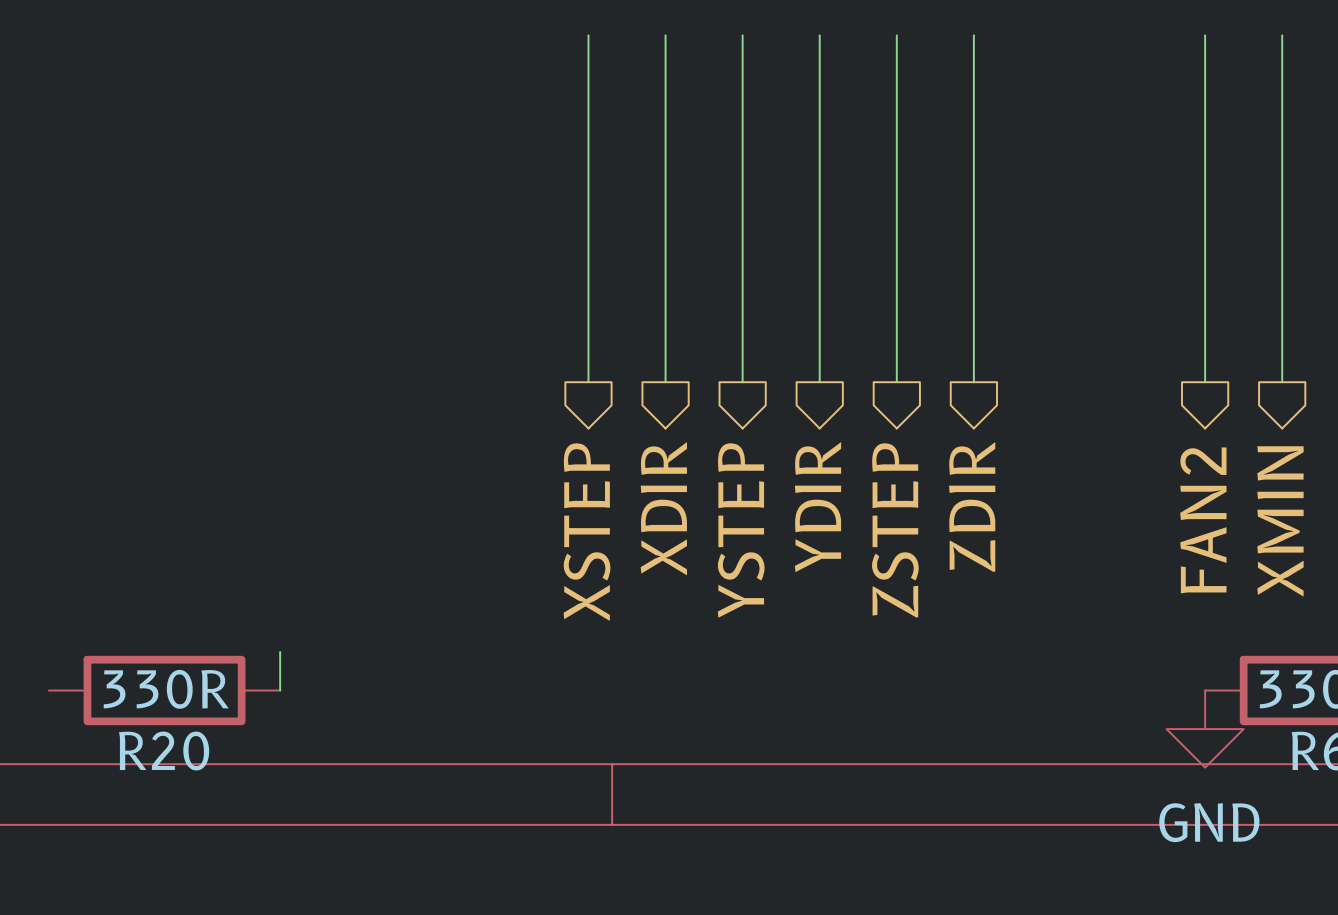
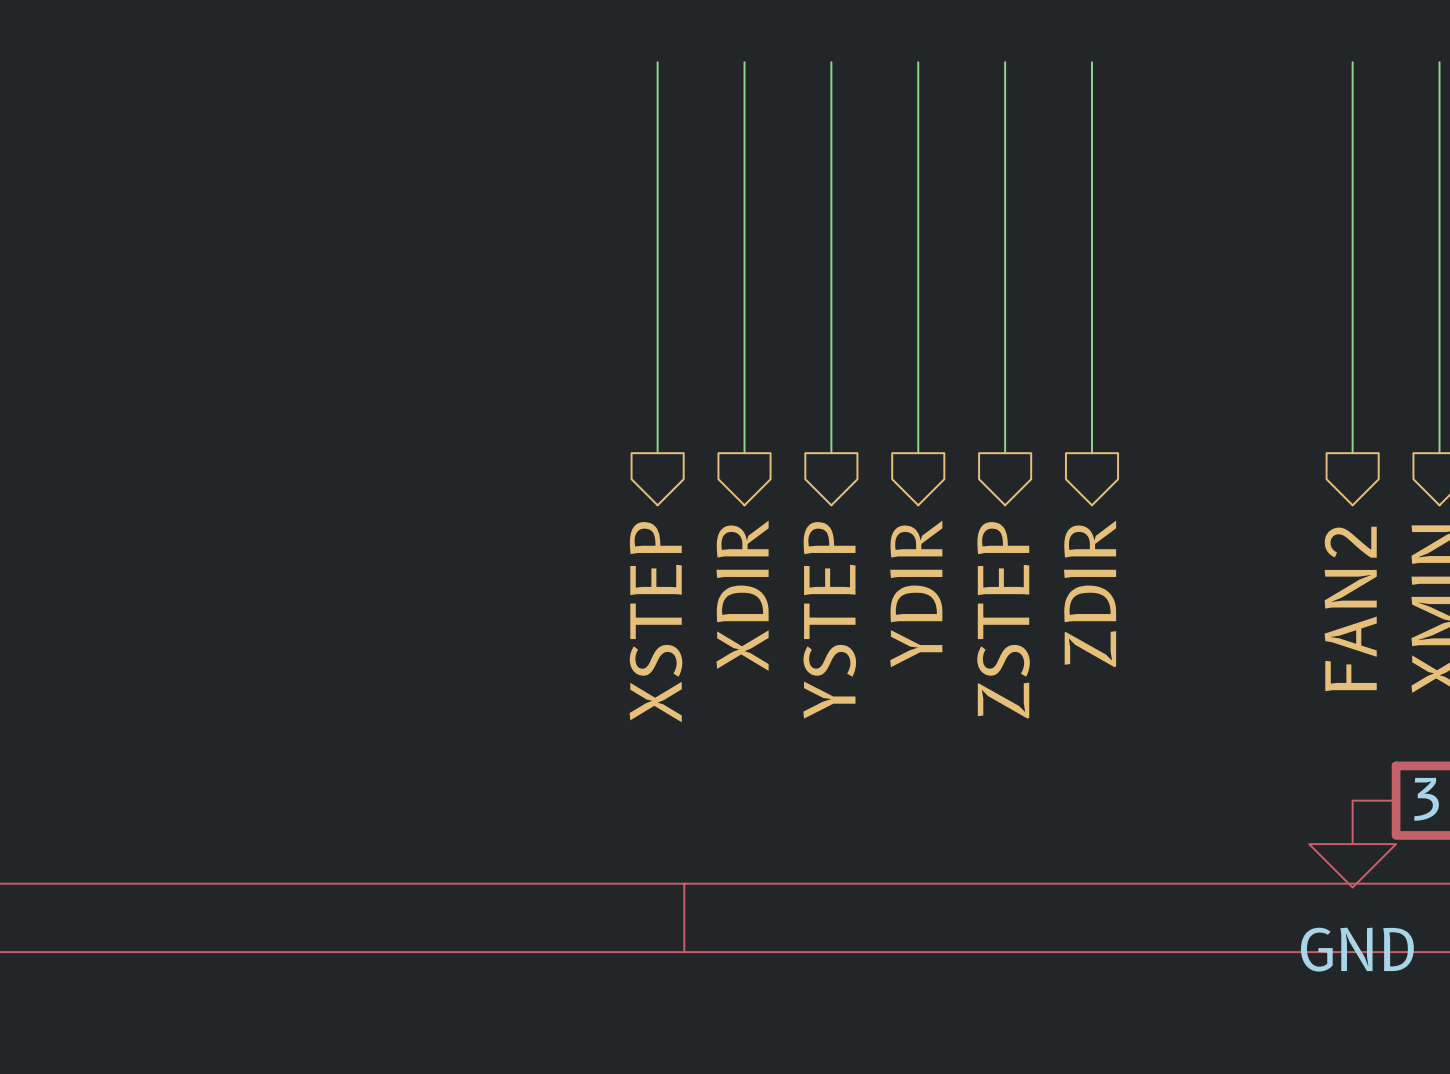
wire: (280, 651) (280, 690) -> none
R20: 330R (164, 690) -> none

